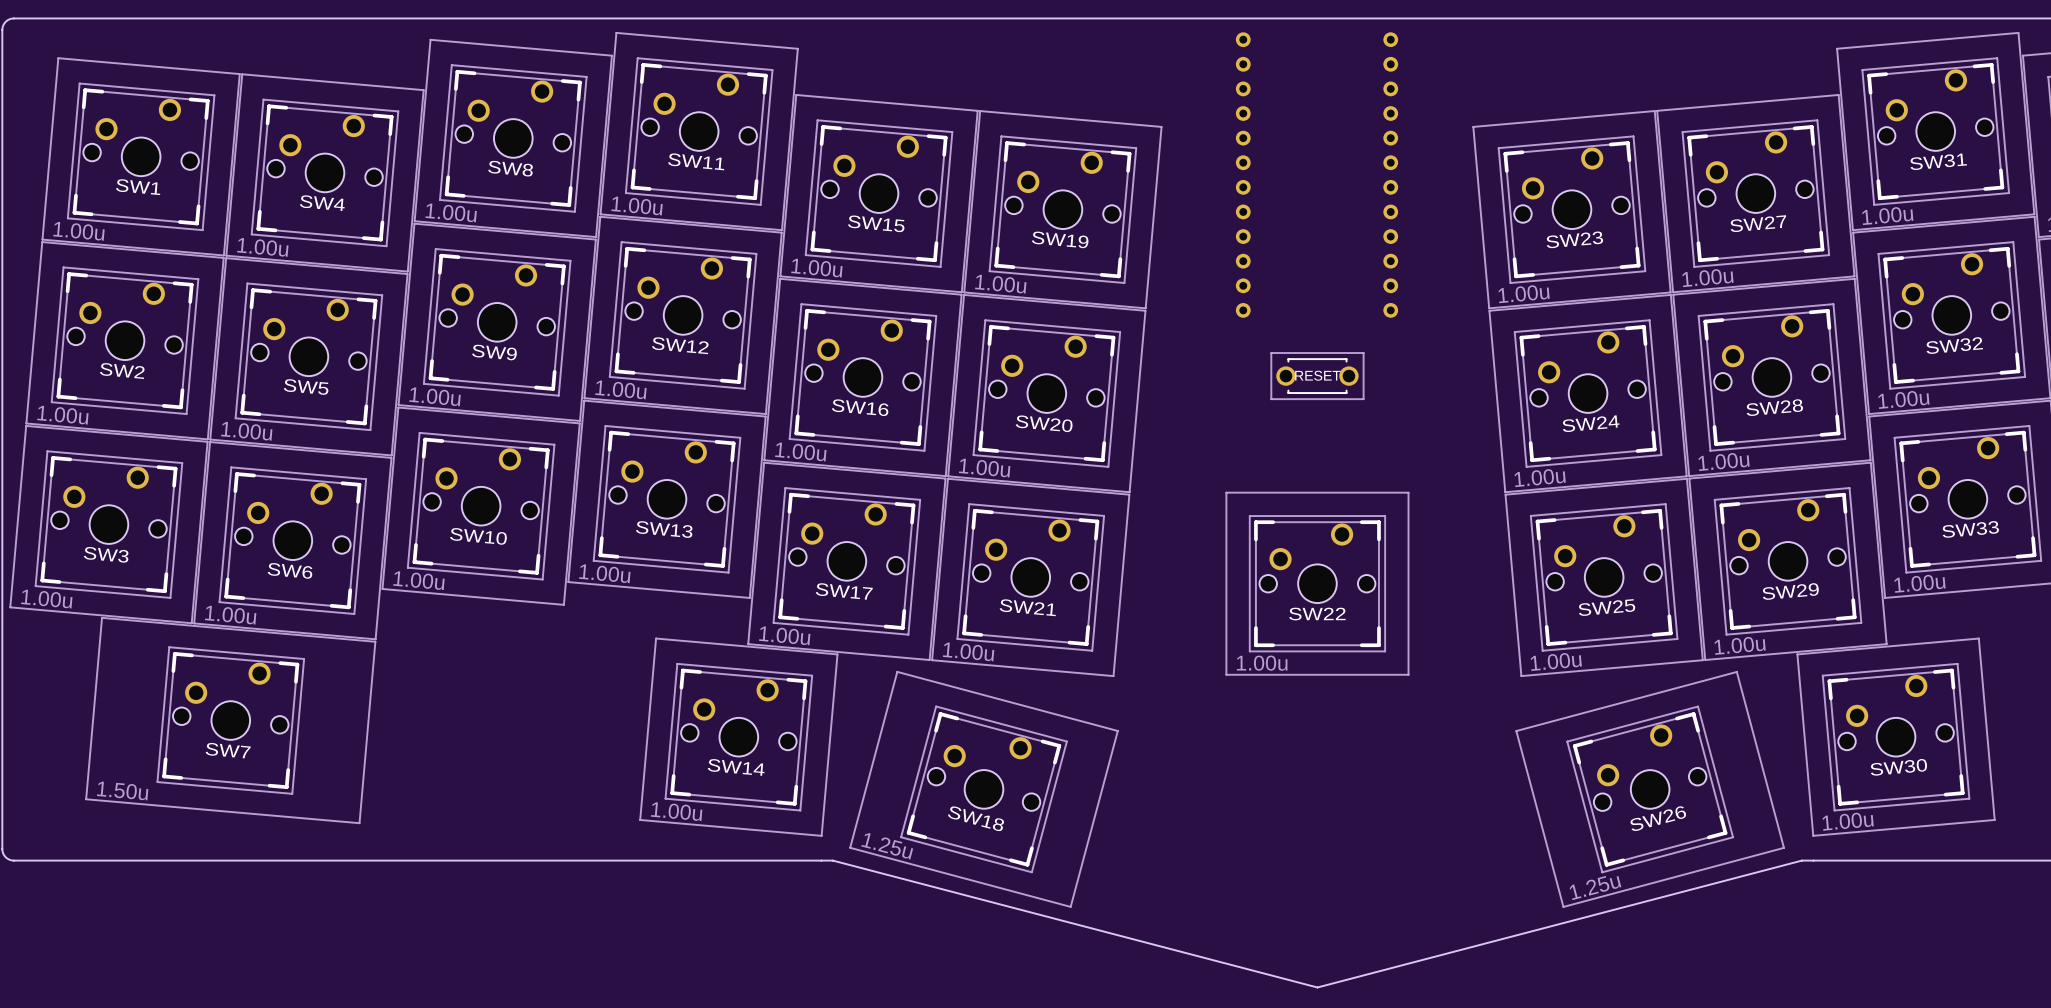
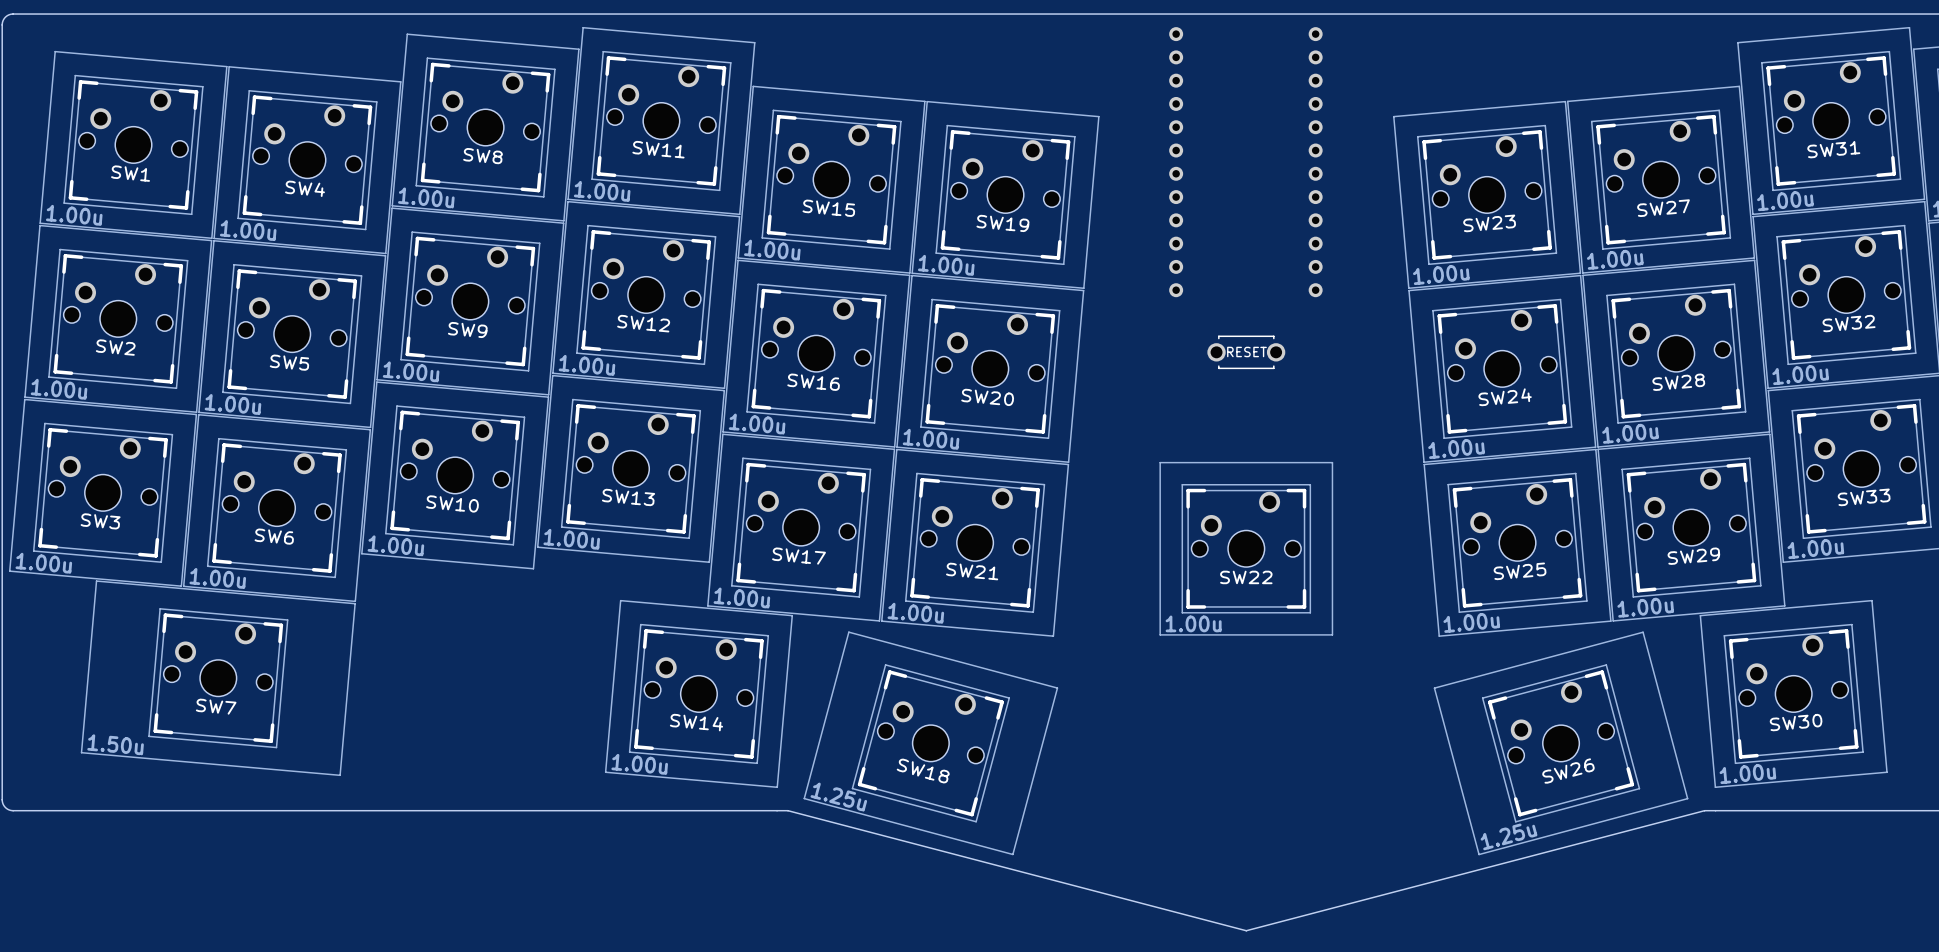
line: (1271, 353) (1271, 399) (1363, 399) (1363, 353) (1271, 353) -> none

